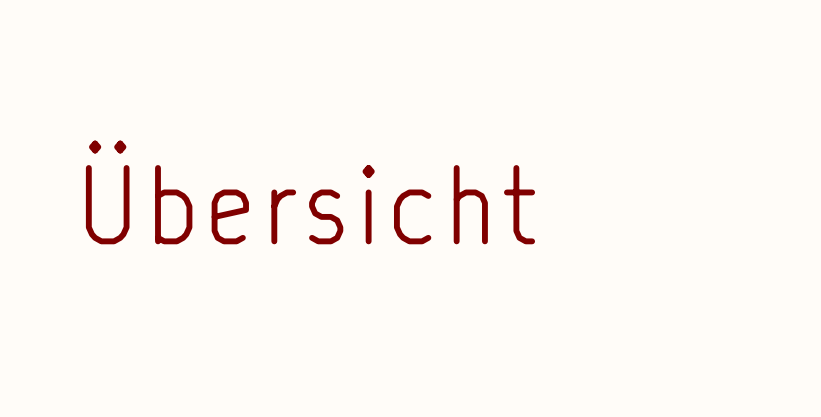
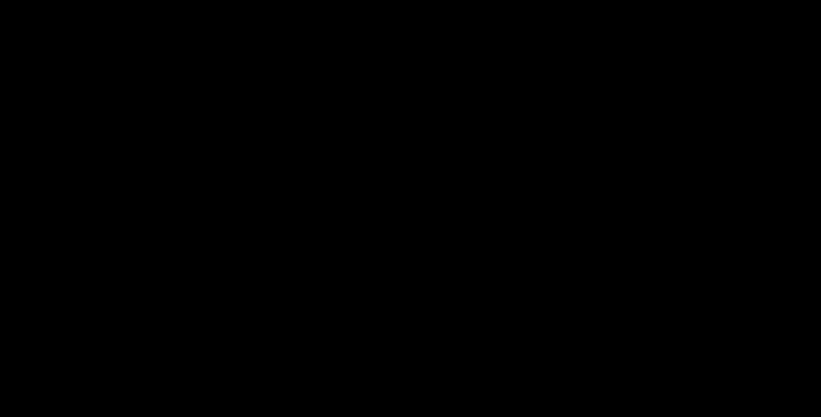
text: Übersicht (310, 192) -> none

